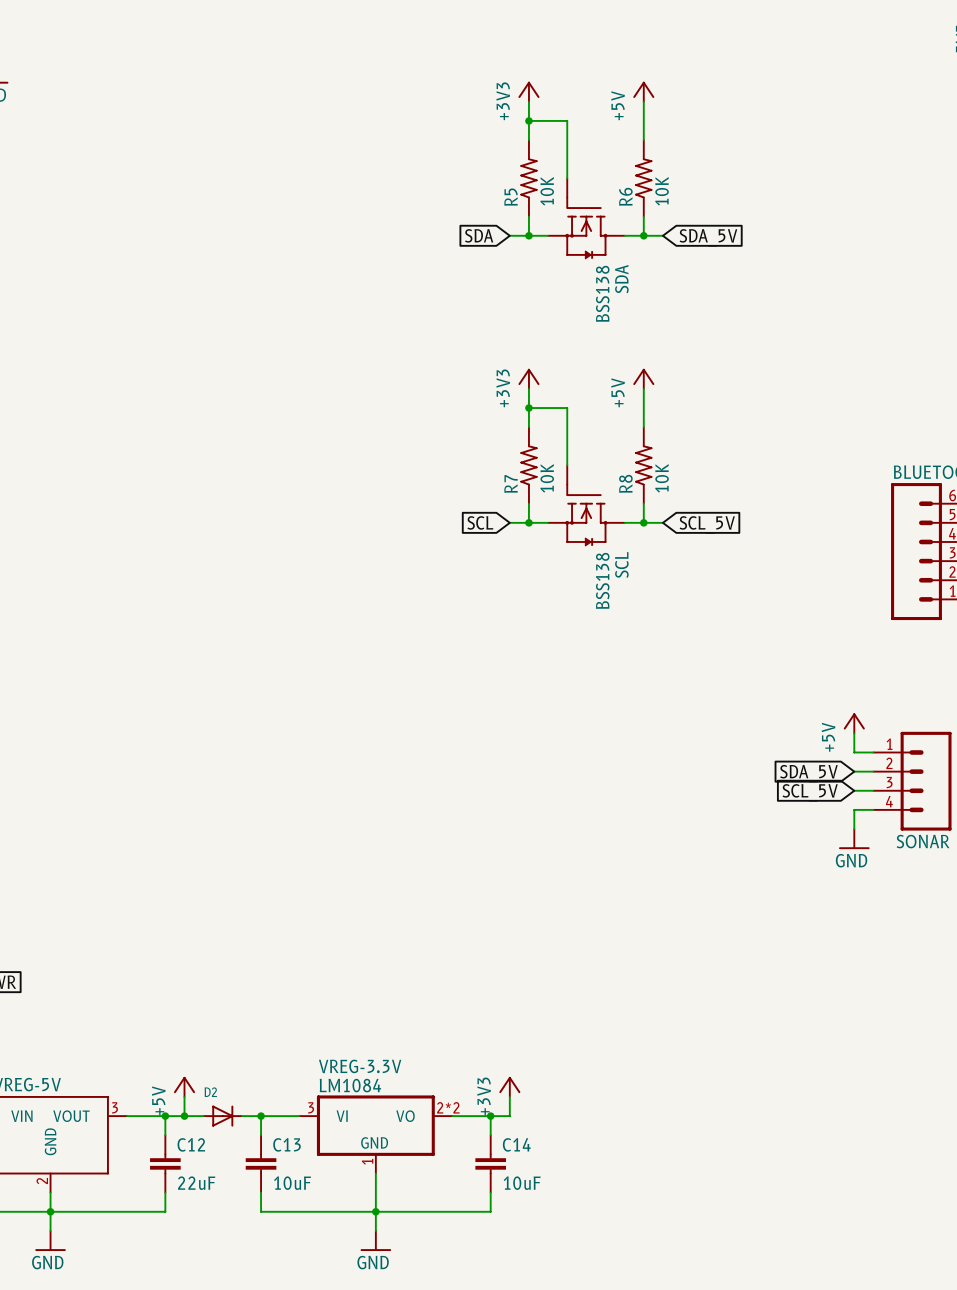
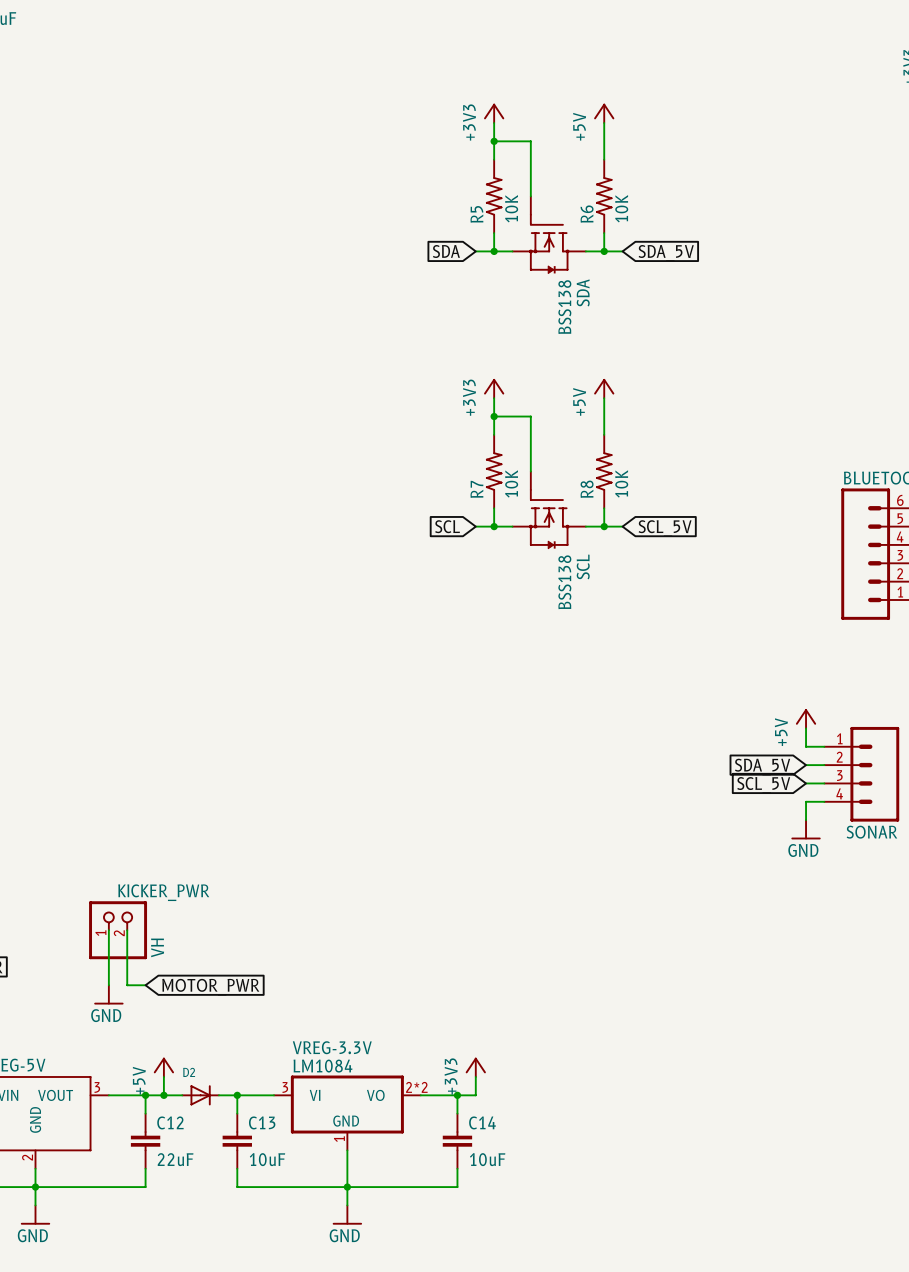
wire: none -> (108, 930) (108, 985)
KICKER_PWR: none -> VH (118, 930)
wire: none -> (127, 930) (127, 985) (145, 985)
global label: none -> MOTOR_PWR (210, 987)
power symbol: none -> GND (108, 994)

